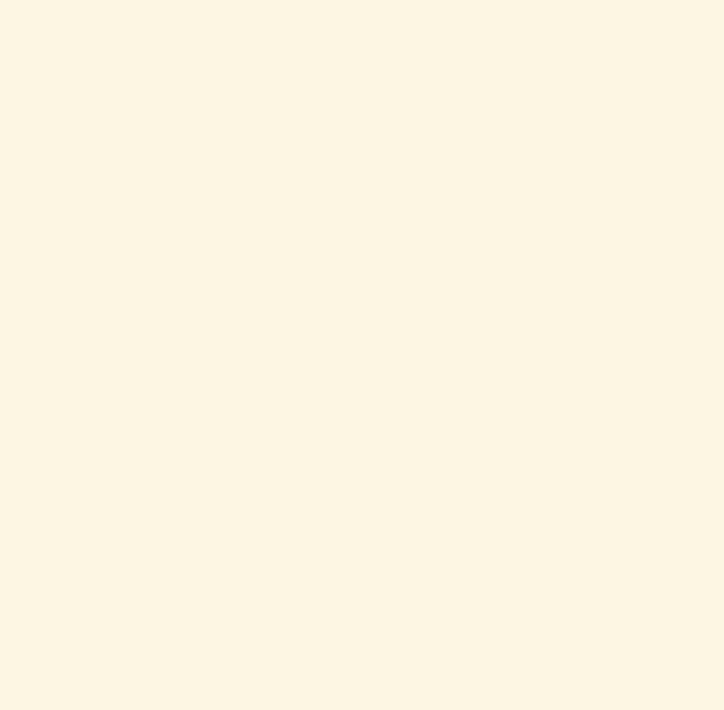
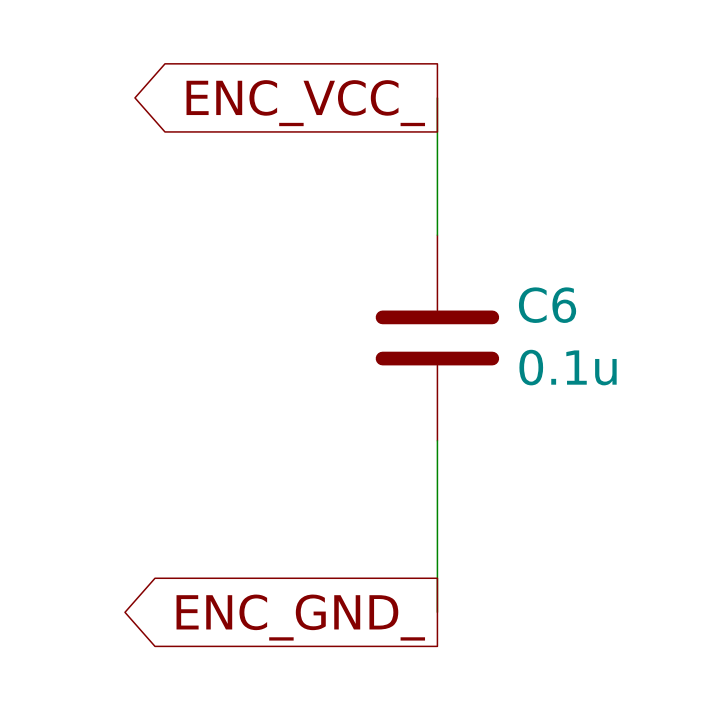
wire: none -> (437, 97) (437, 235)
global label: none -> ENC_VCC_ (305, 103)
C6: none -> 0.1u (437, 337)
wire: none -> (437, 440) (437, 612)
global label: none -> ENC_GND_ (300, 617)

